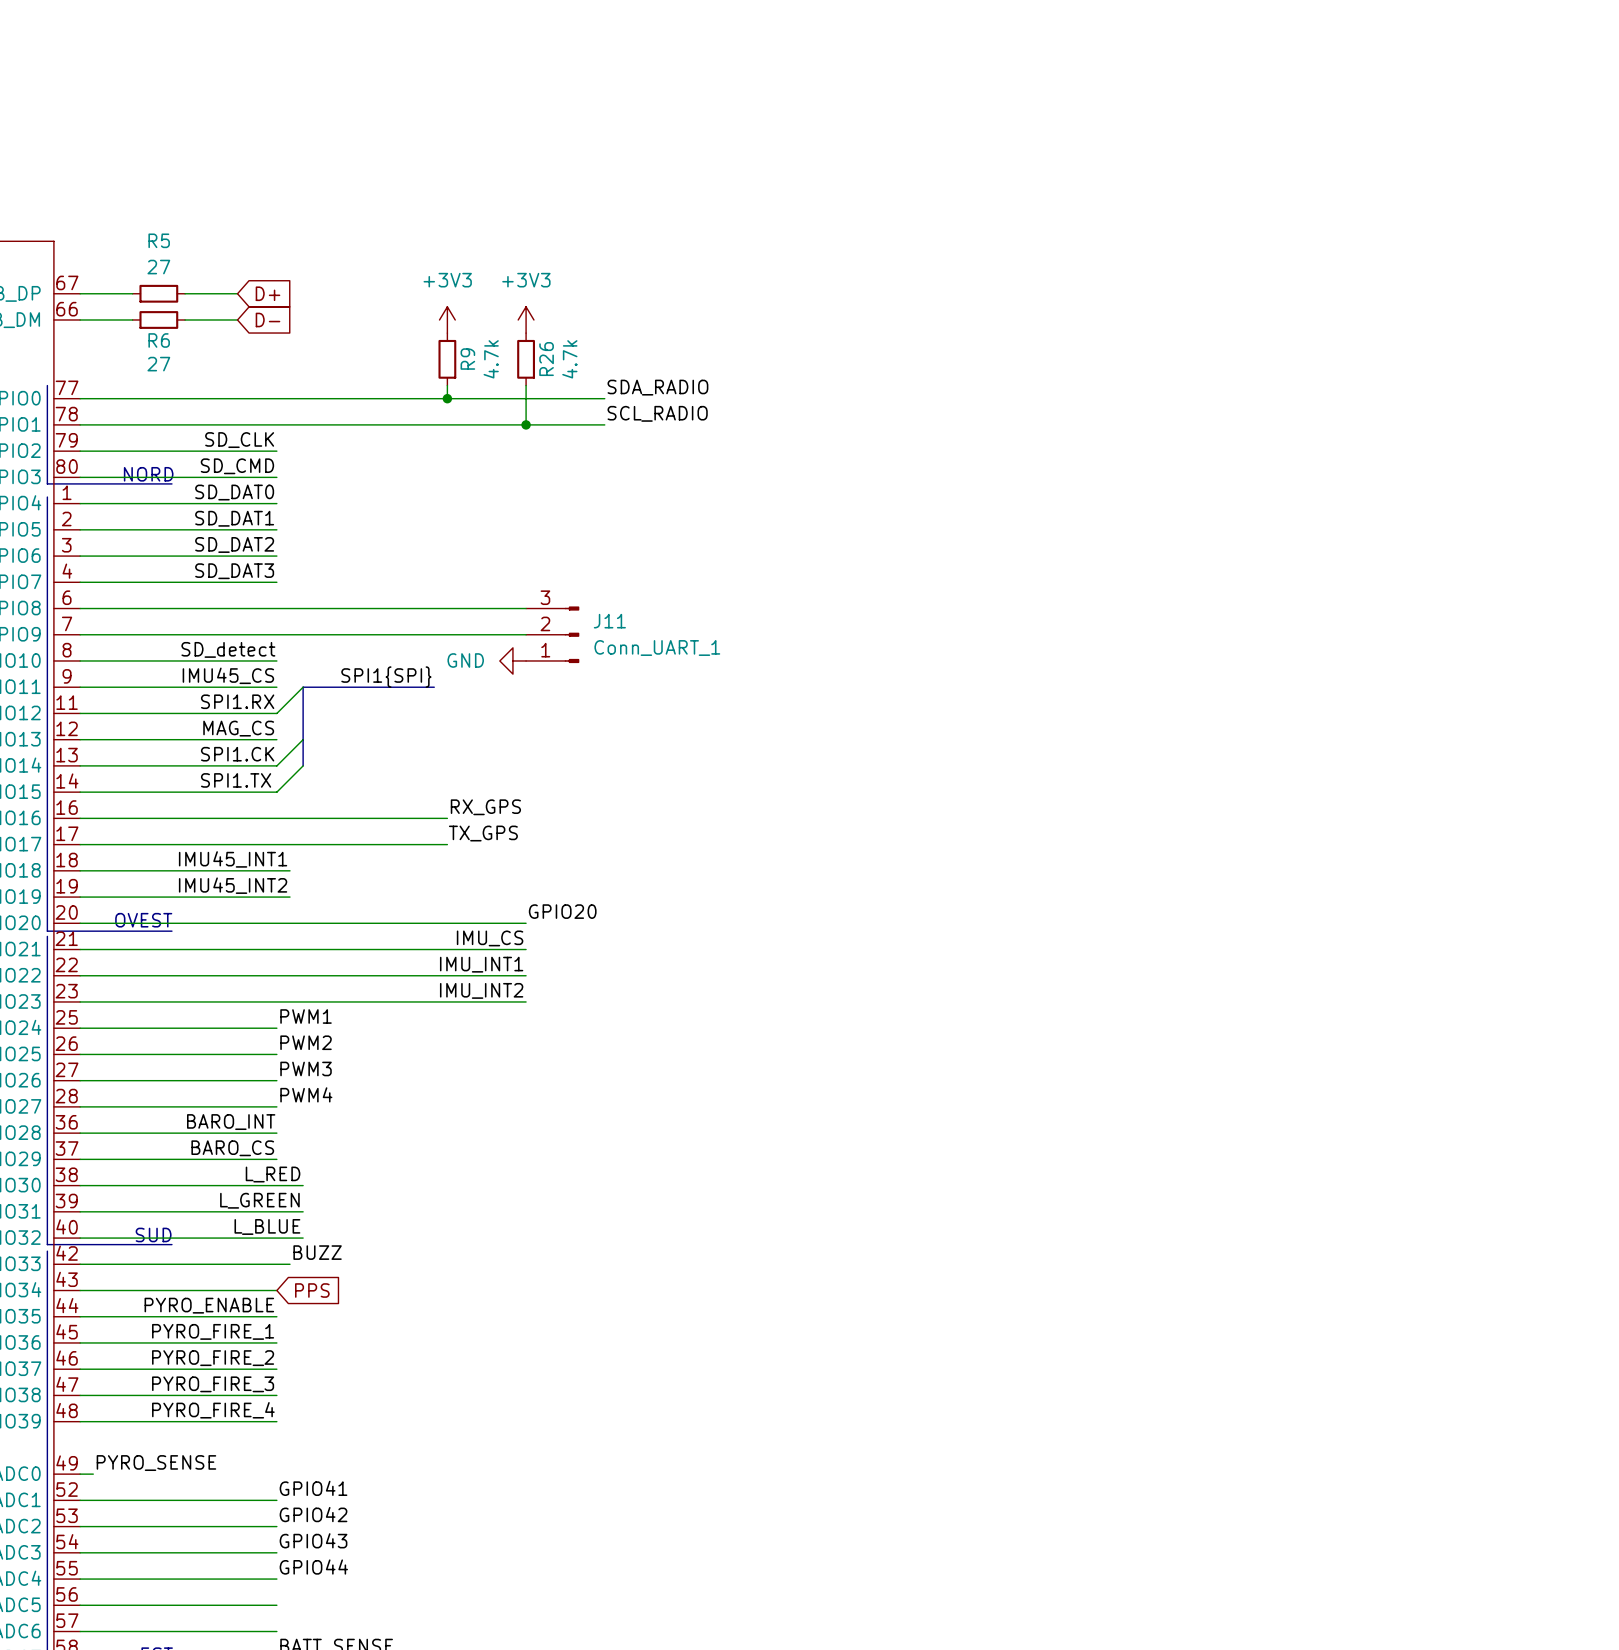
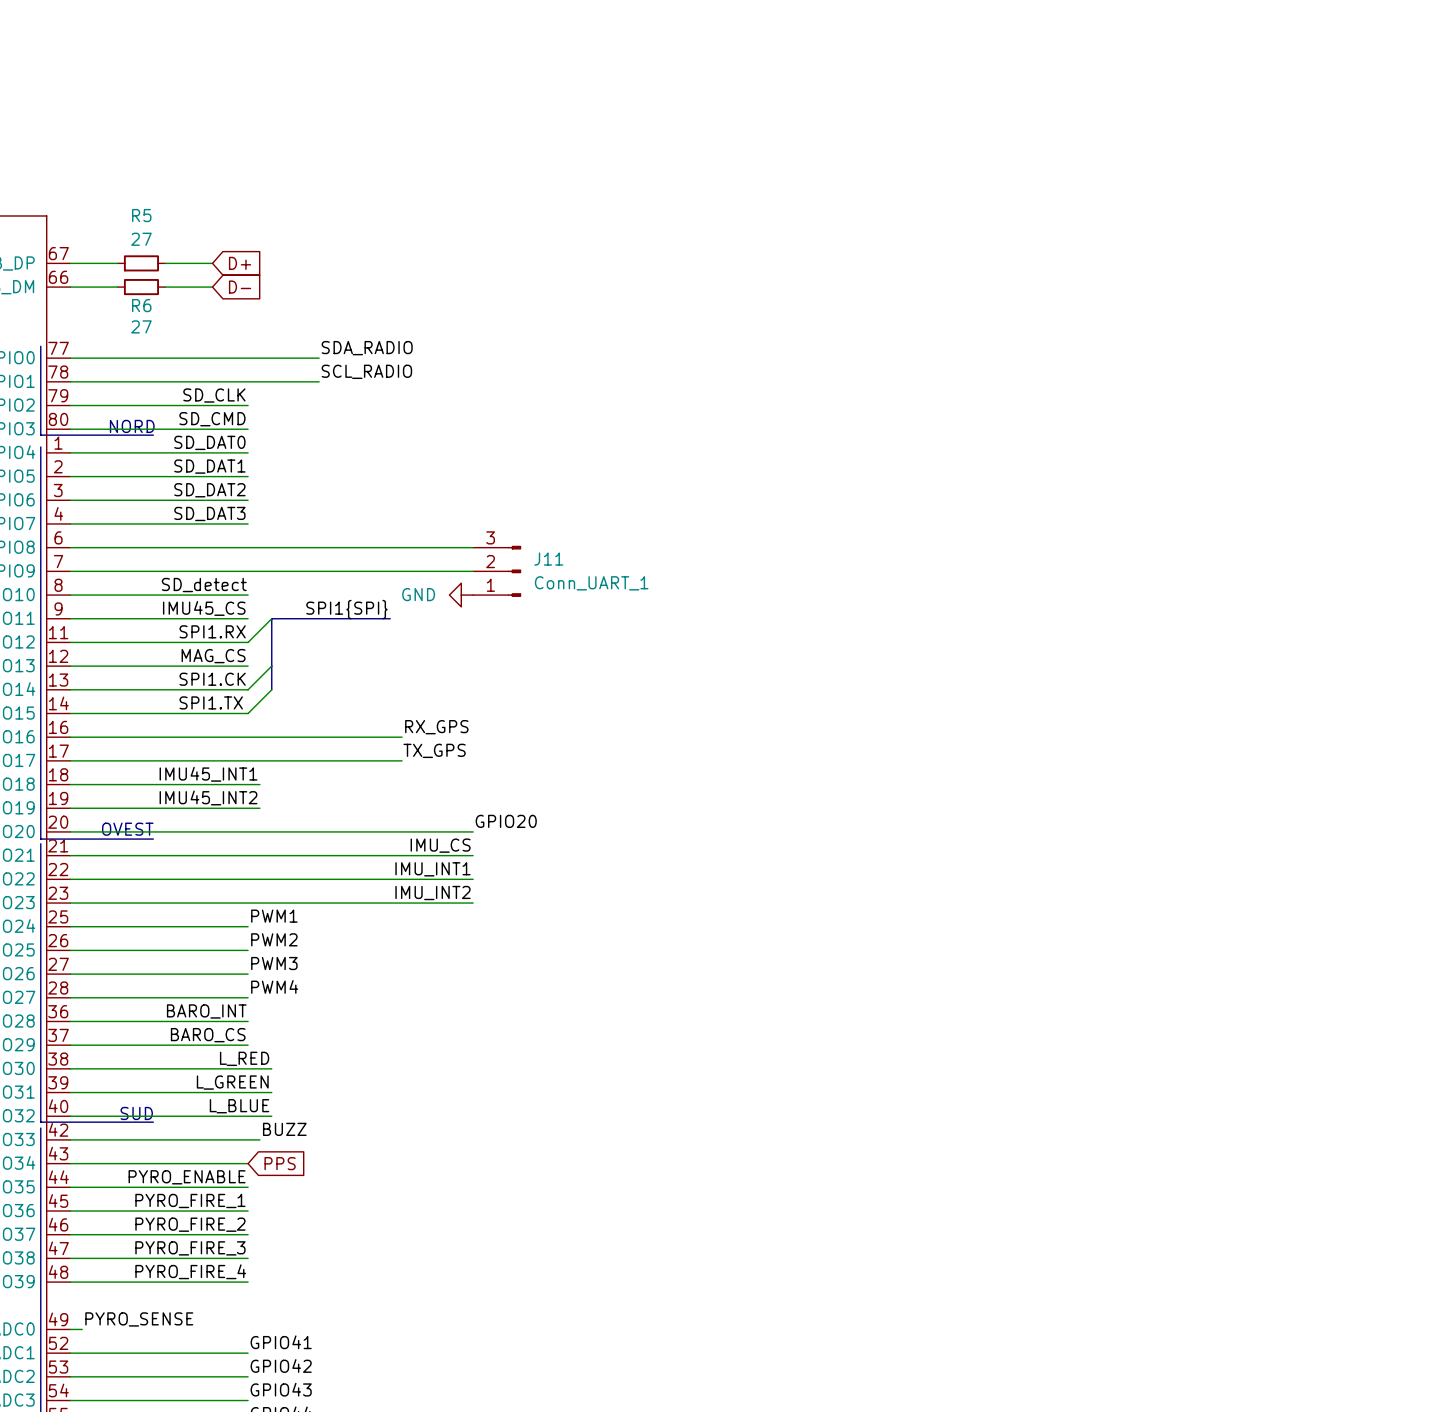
power symbol: +3V3 (447, 319) -> none
power symbol: +3V3 (526, 319) -> none
R9: 4.7k (447, 359) -> none
R26: 4.7k (526, 359) -> none
wire: (447, 385) (447, 398) -> none
wire: (526, 385) (526, 424) -> none
label position: SDA_RADIO (657, 387) -> SDA_RADIO (367, 348)
wire: (355, 398) (604, 398) -> none
junction: (447, 398) -> none
label position: SCL_RADIO (657, 413) -> SCL_RADIO (366, 371)
wire: (355, 424) (604, 424) -> none
junction: (526, 424) -> none

